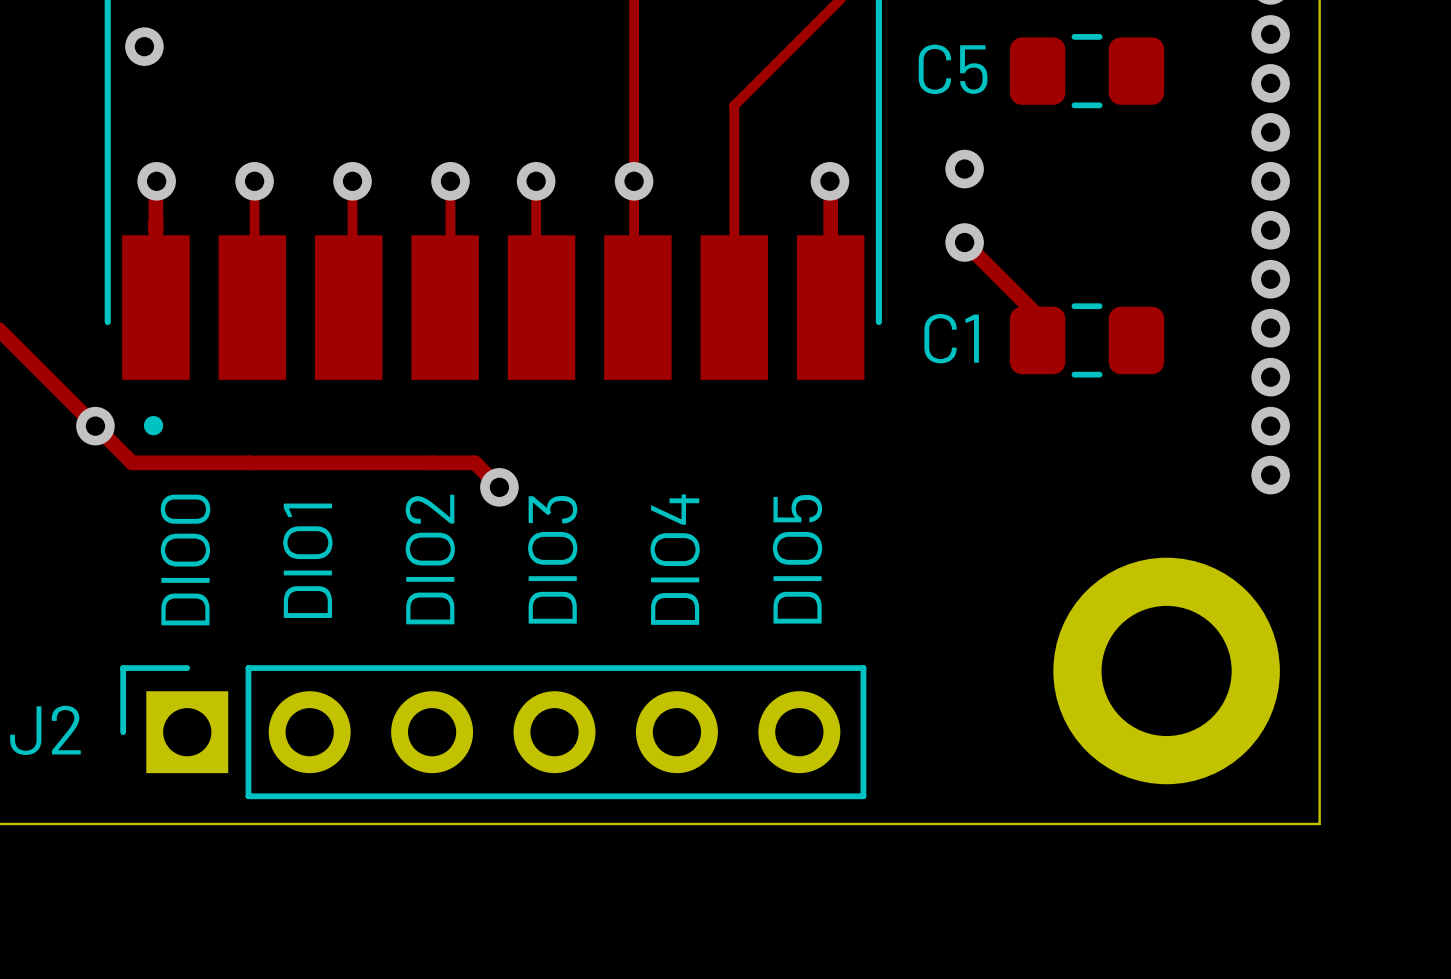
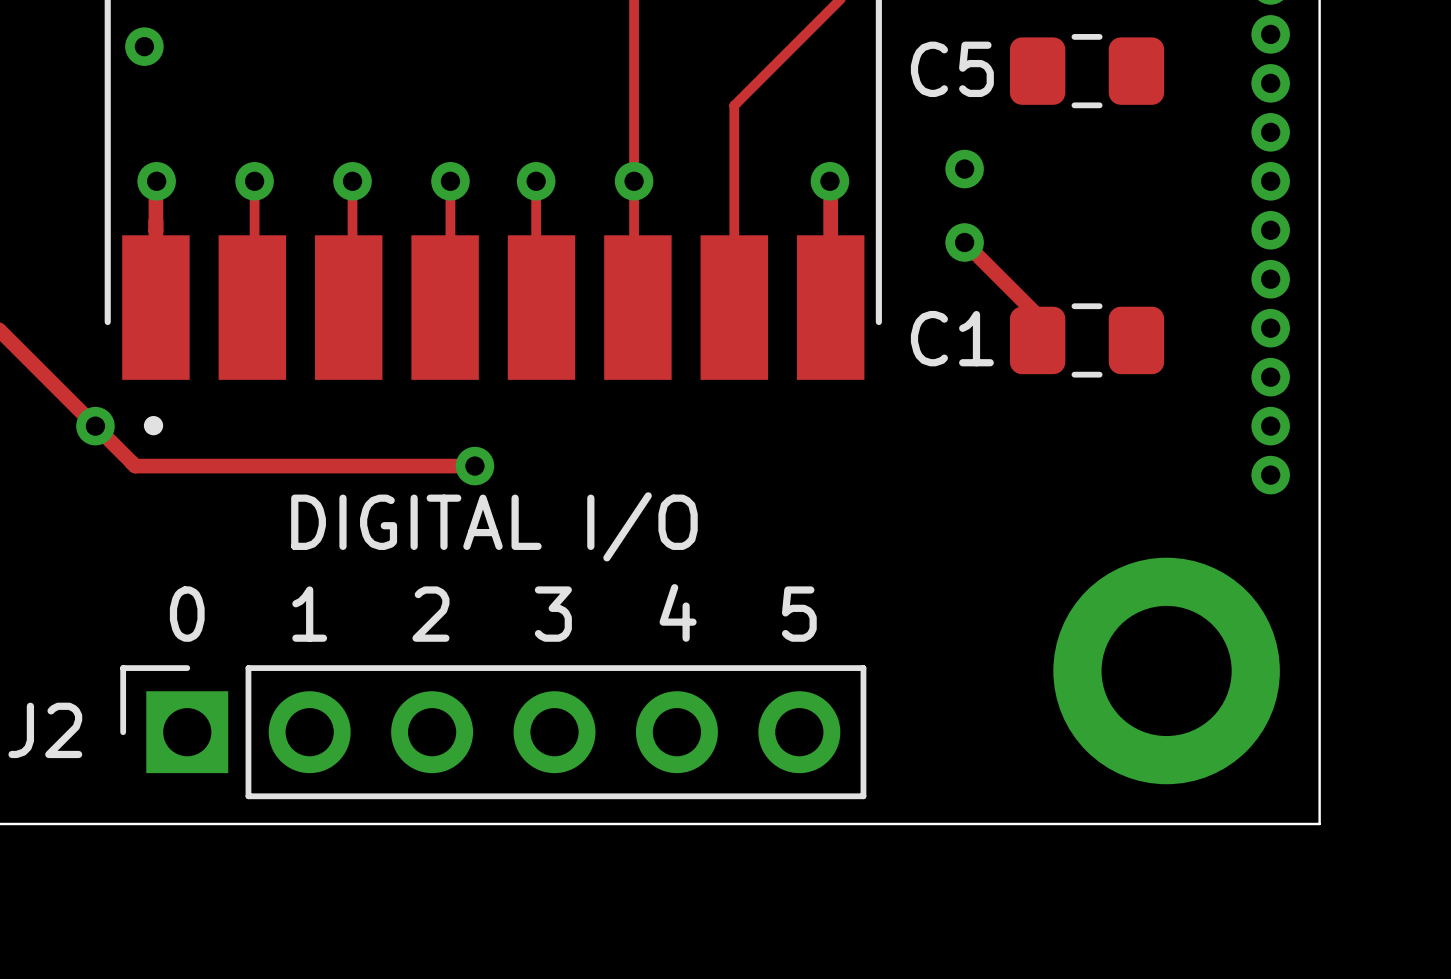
track: (132, 462) (474, 462) (499, 487) -> (132, 462) (135, 466) (474, 466)
via position: (499, 487) -> (474, 466)
text: none -> DIGITAL I/O (494, 526)
text: DIO2 (430, 559) -> none
text: DIO3 (552, 559) -> none
text: DIO4 (675, 559) -> none
text: DIO5 (797, 559) -> none
text: DIO0 (185, 560) -> none
text: DIO1 (307, 560) -> none
text: none -> 2 (430, 614)
text: none -> 0 (187, 614)
text: none -> 1 (309, 614)
text: none -> 3 (553, 614)
text: none -> 4 (678, 612)
text: none -> 5 (799, 614)

